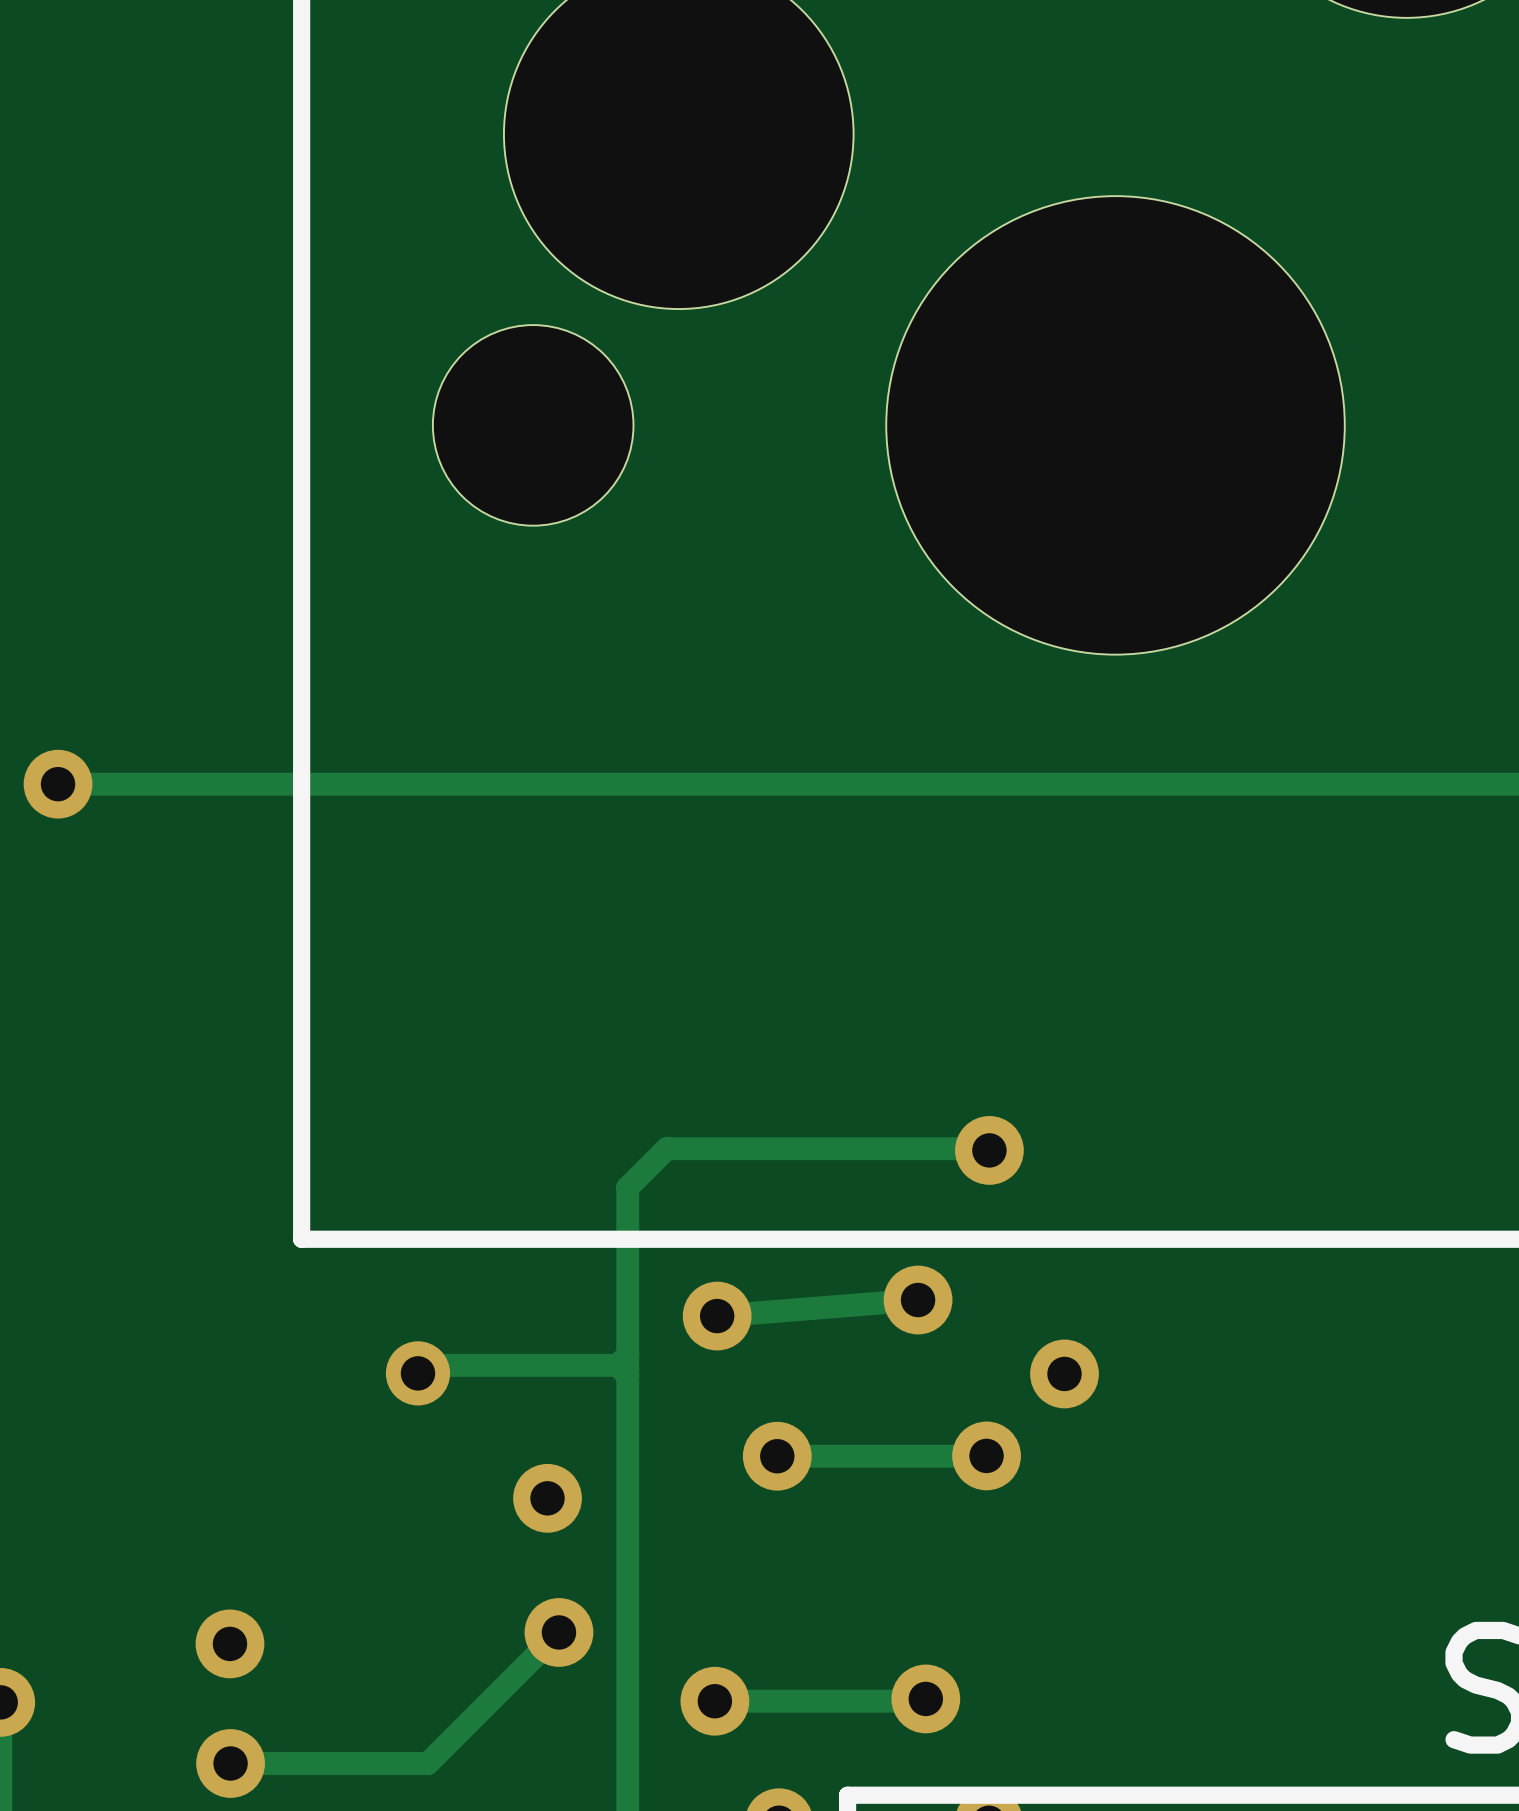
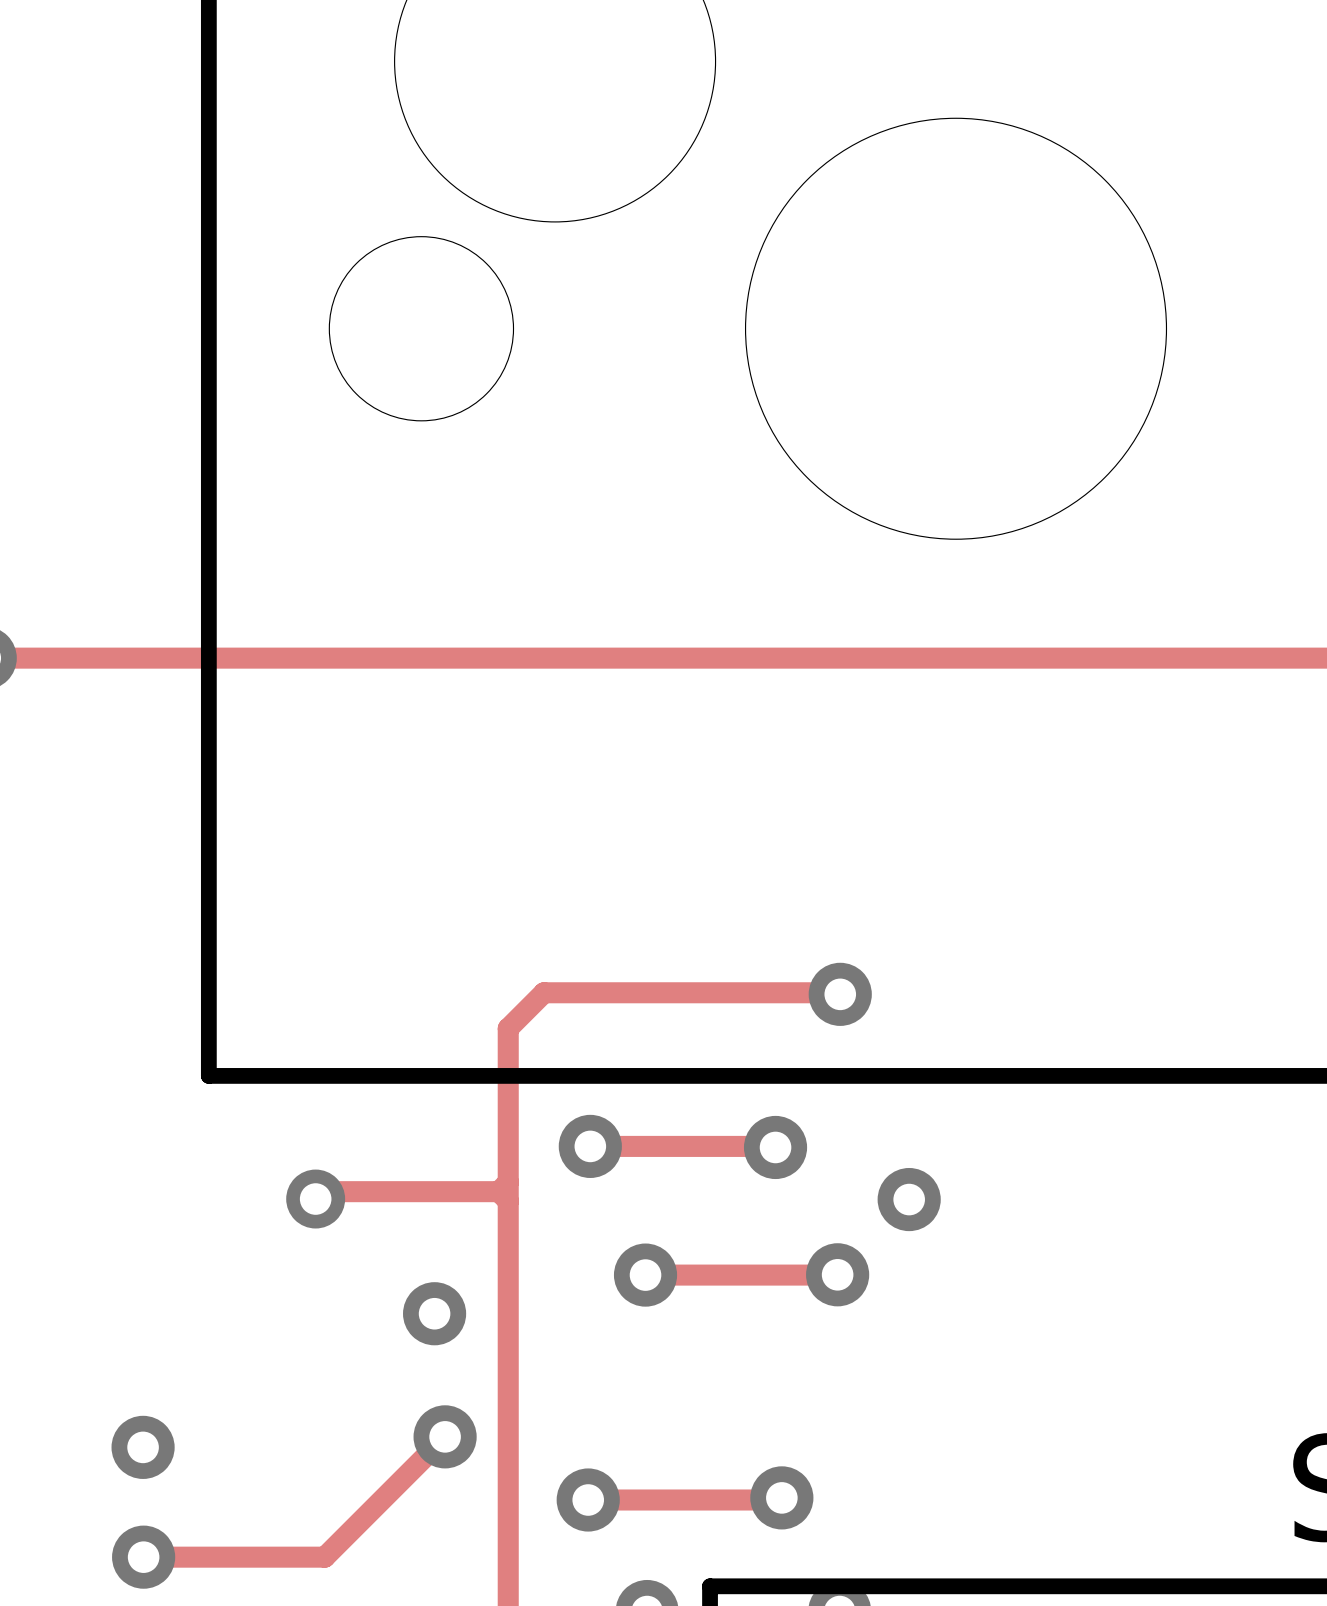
track: (918, 1300) (717, 1316) -> (774, 1146) (590, 1146)
via position: (918, 1300) -> (775, 1147)

